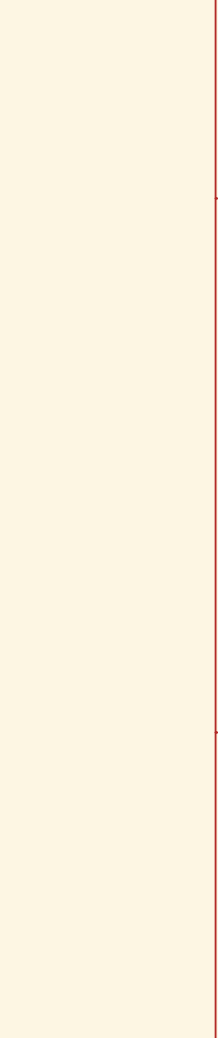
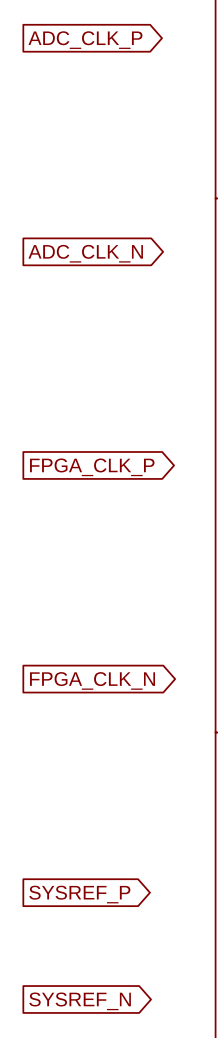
global label: none -> ADC_CLK_P (85, 40)
global label: none -> ADC_CLK_N (85, 253)
global label: none -> FPGA_CLK_P (92, 467)
global label: none -> FPGA_CLK_N (92, 680)
global label: none -> SYSREF_P (79, 894)
global label: none -> SYSREF_N (80, 1001)

